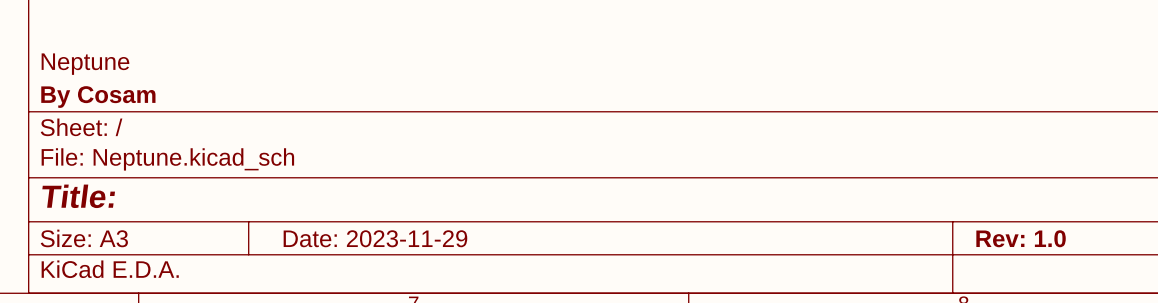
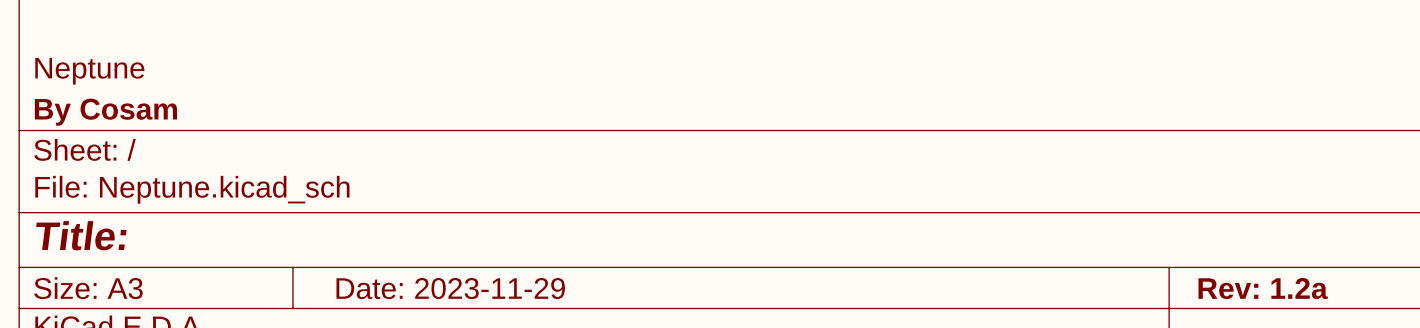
title block: Rev: 1.0 (1021, 238) -> Rev: 1.2a (1263, 288)

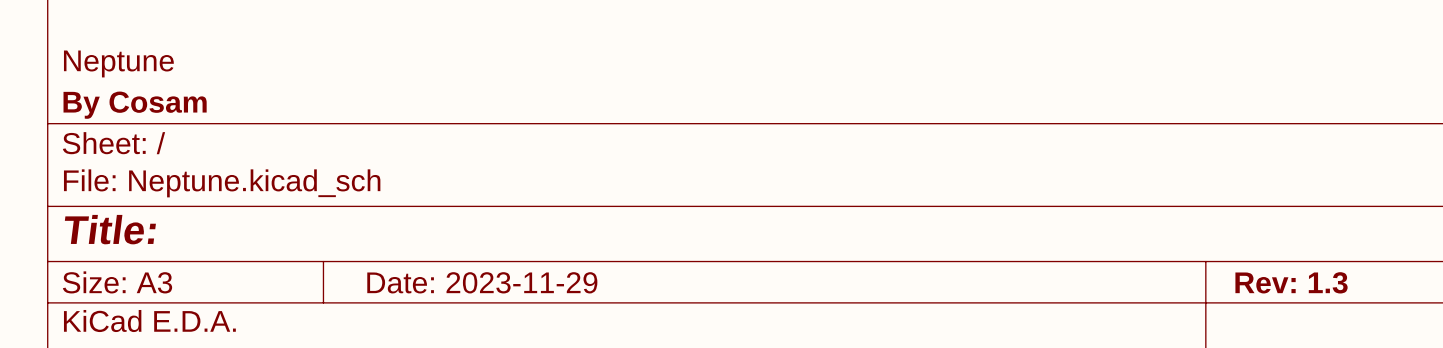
title block: Rev: 1.2a (1263, 288) -> Rev: 1.3 (1291, 282)

